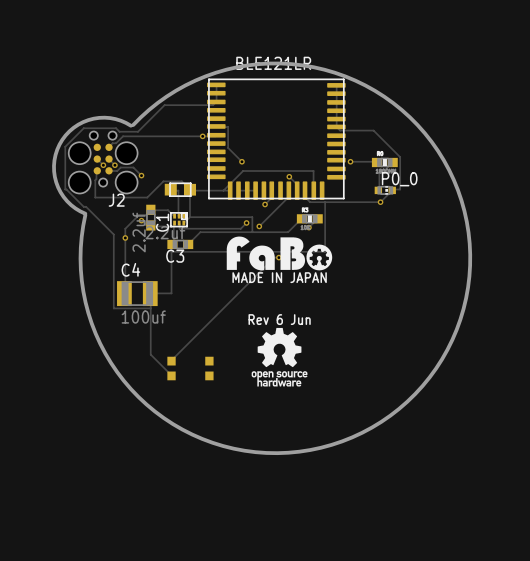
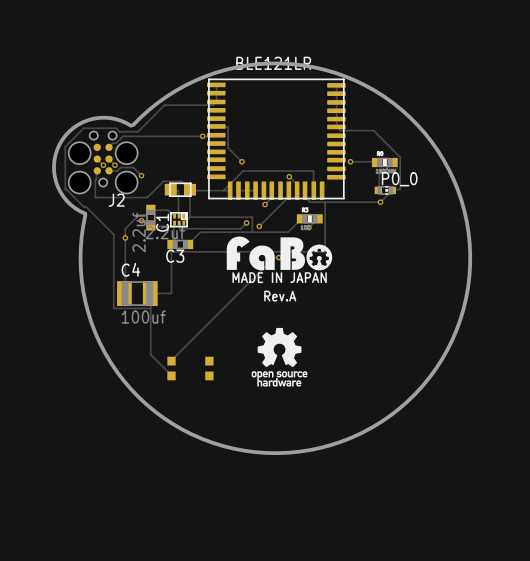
text: none -> Rev.A (280, 296)
text: Rev 6 Jun (279, 319) -> none

